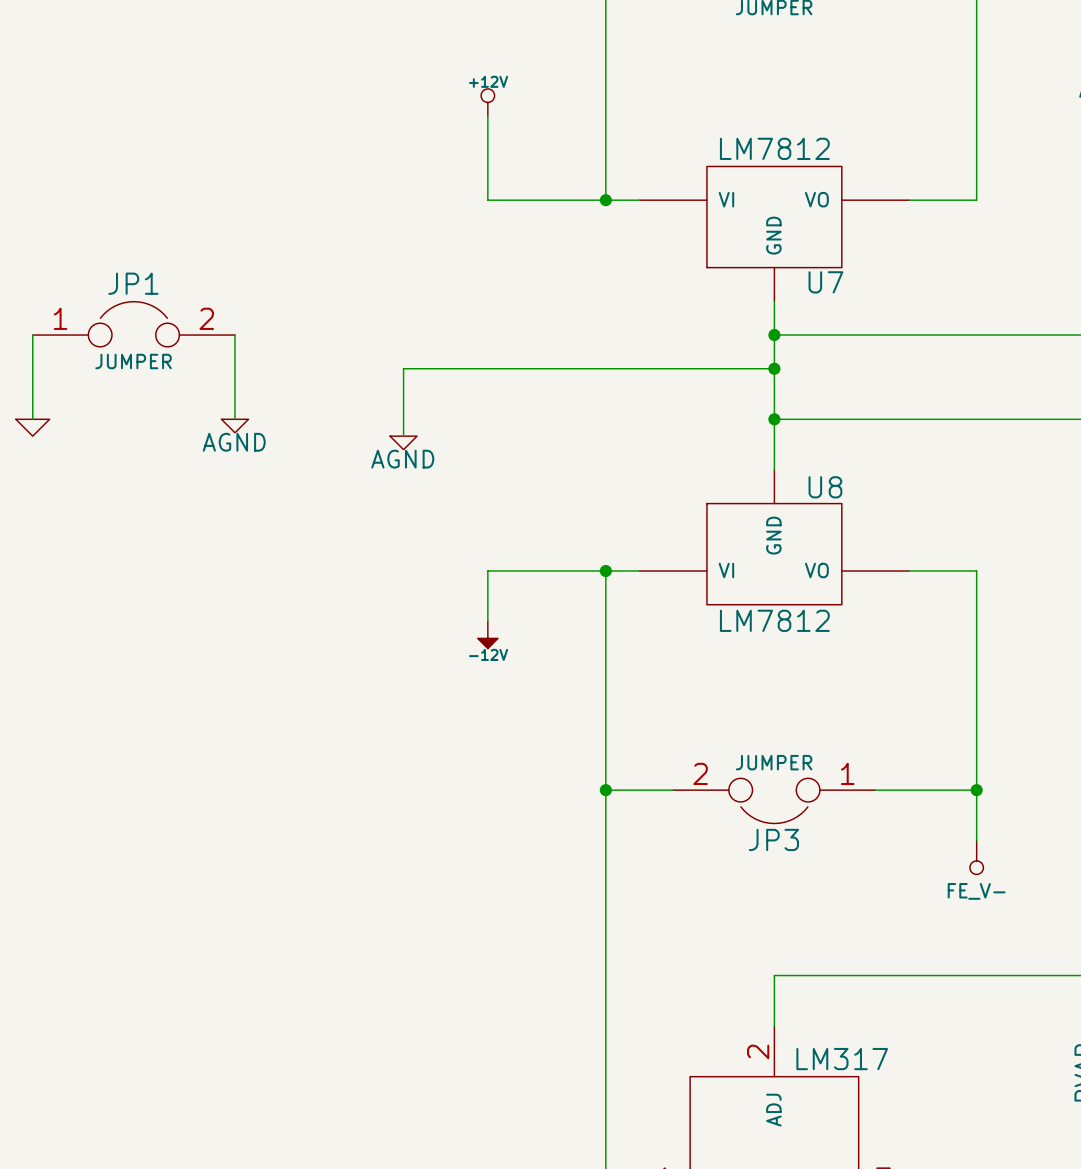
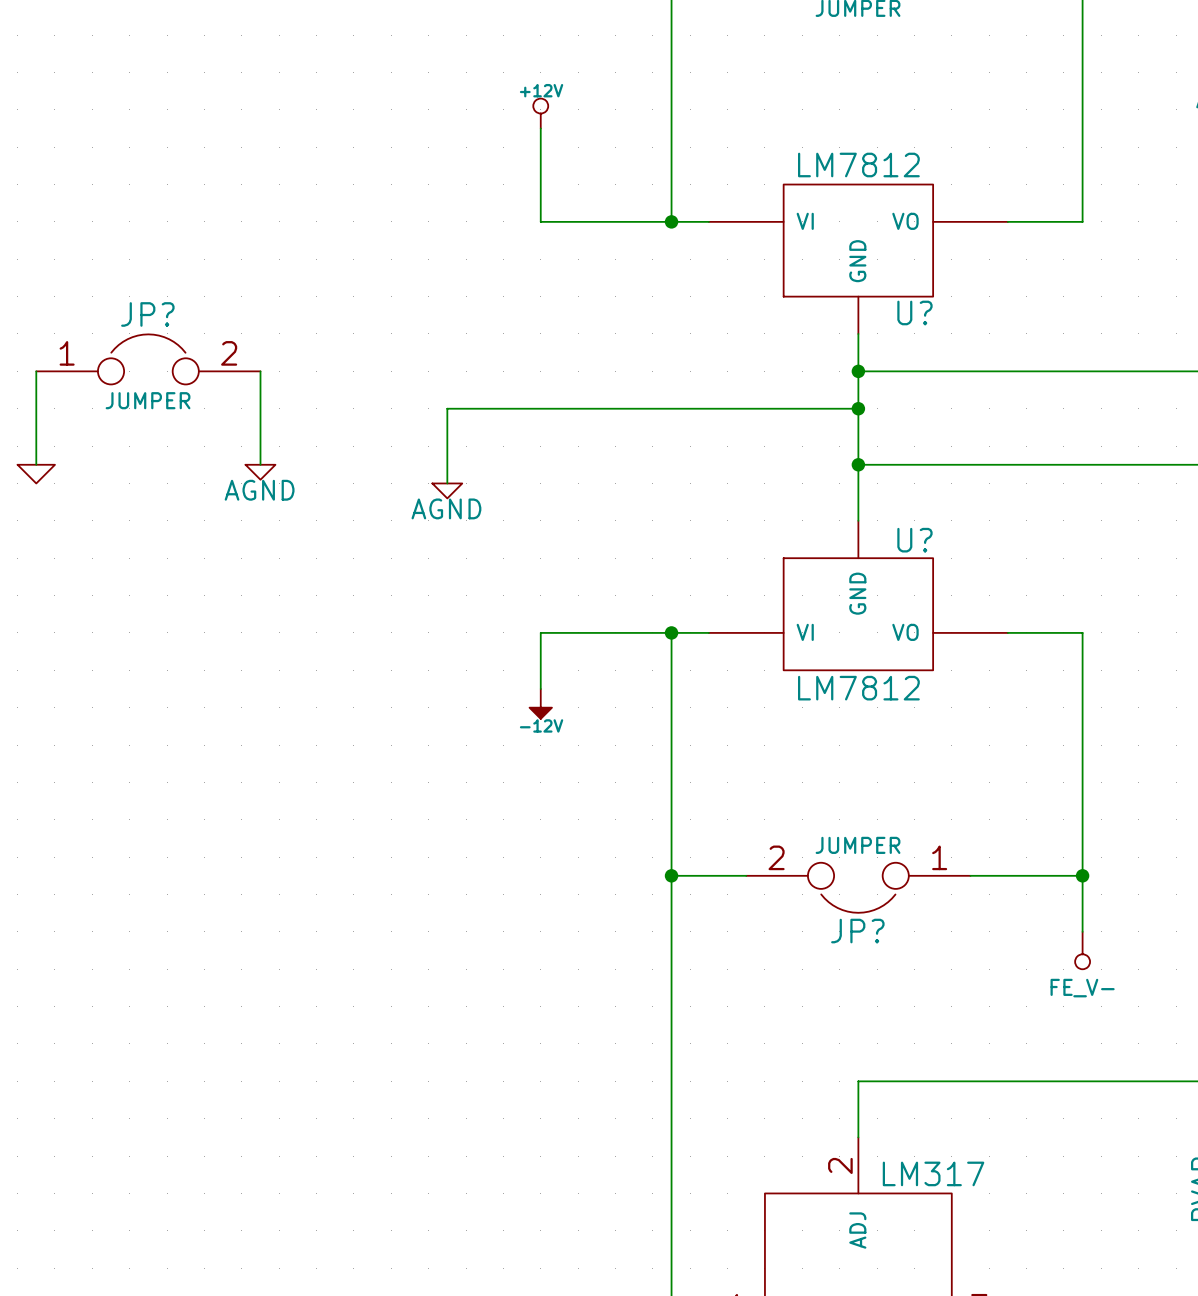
U7 name: U7 (825, 282) -> U? (914, 312)
JP1 name: JP1 (133, 283) -> JP? (147, 314)
U8 name: U8 (825, 487) -> U? (914, 540)
JP3 name: JP3 (773, 839) -> JP? (857, 931)

